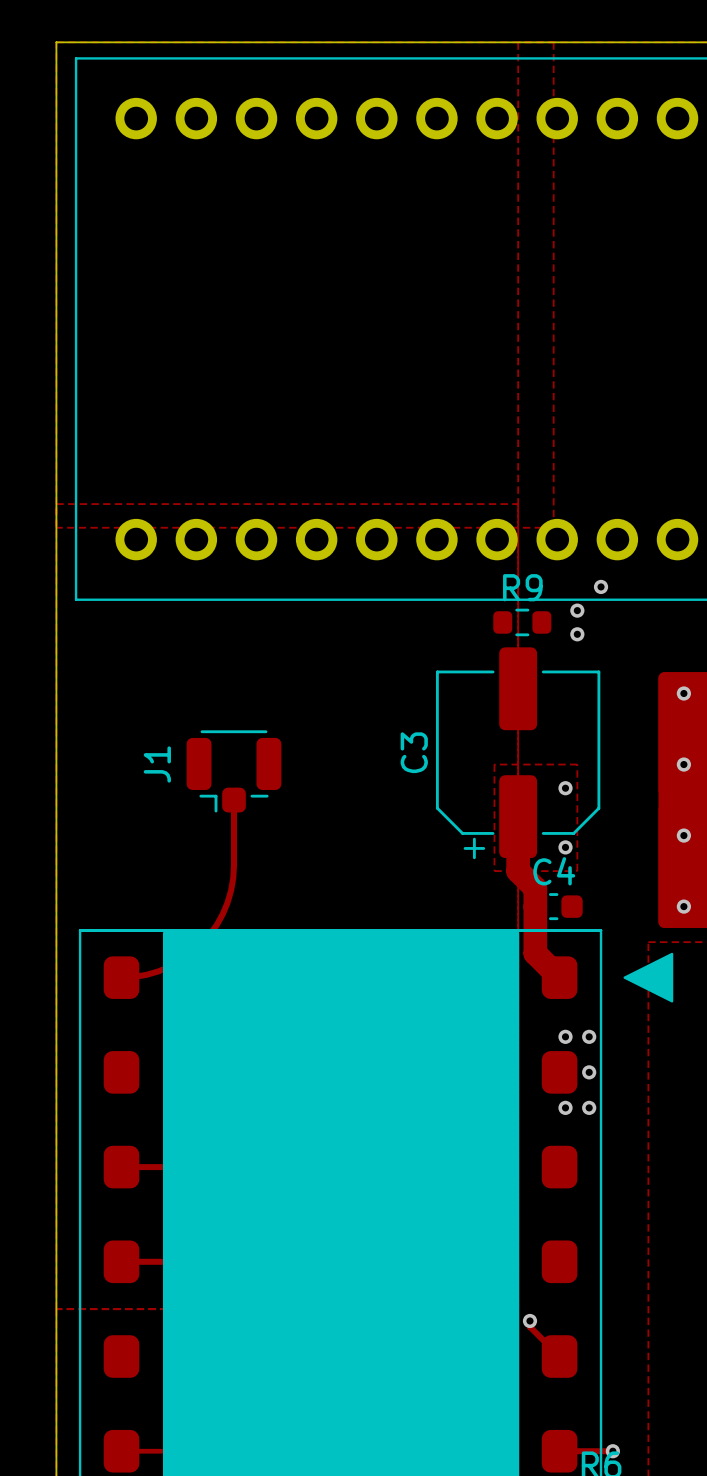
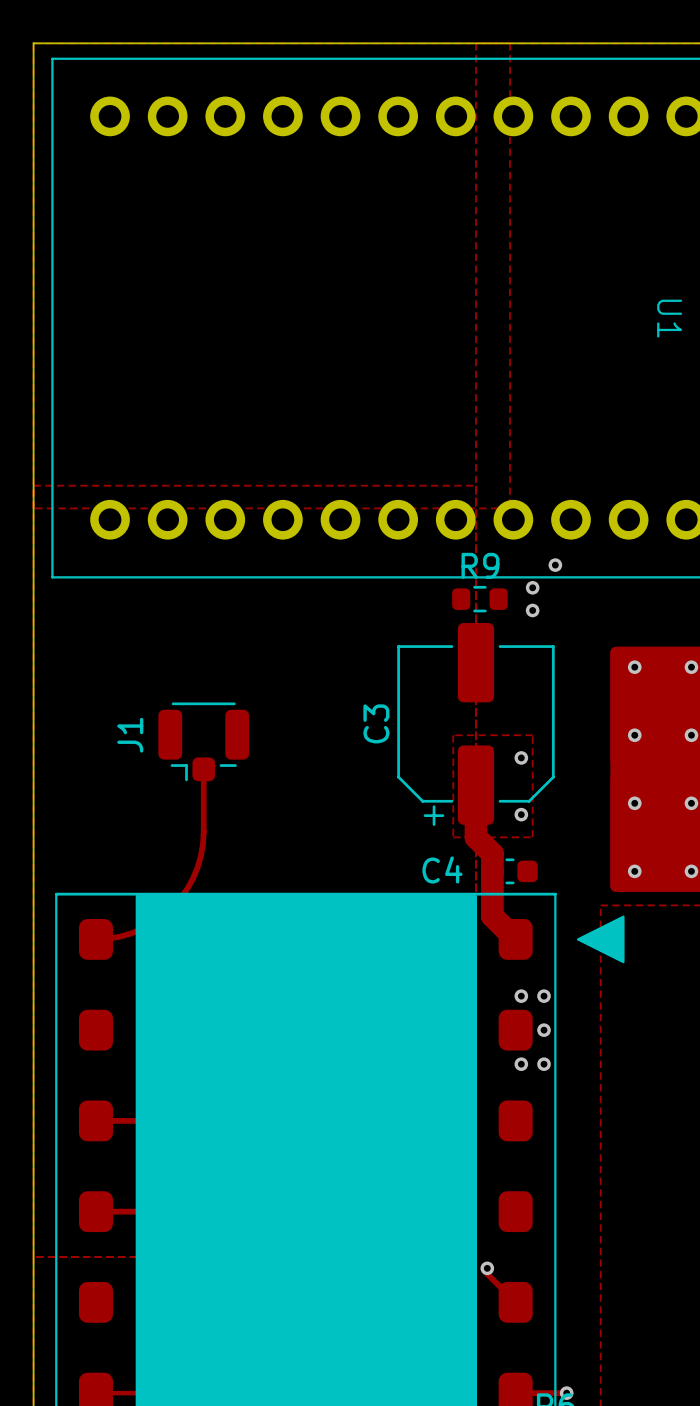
C4 name position: C4 (554, 871) -> C4 (442, 869)

